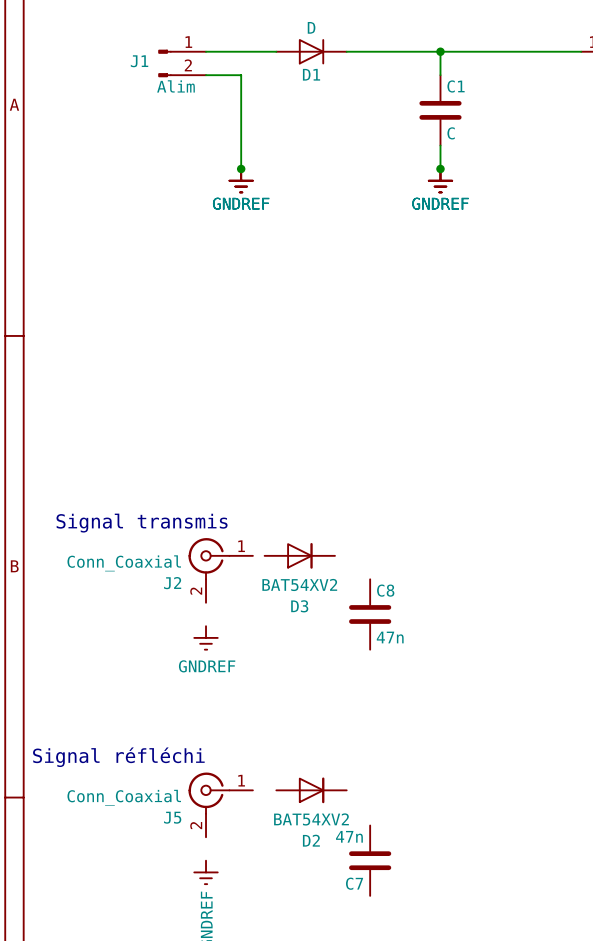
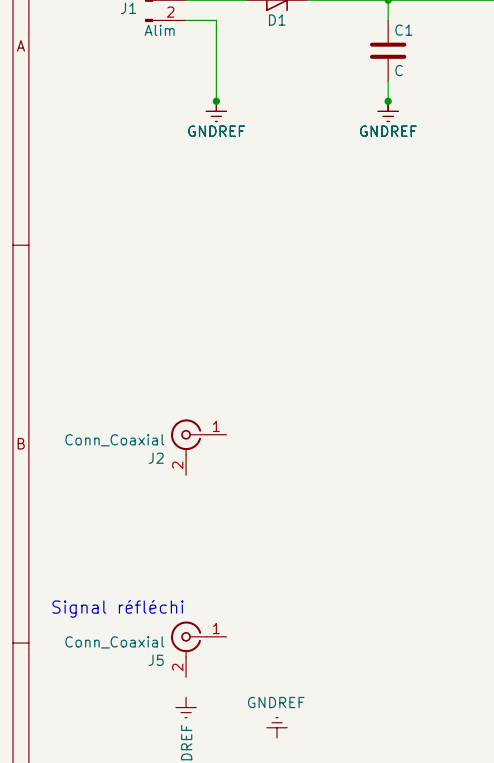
text: Signal transmis (142, 523) -> none
D3: BAT54XV2 (299, 555) -> none
C8: 47n (370, 614) -> none
power symbol: GNDREF (206, 637) -> none
D2: BAT54XV2 (311, 790) -> none
C7: 47n (370, 860) -> none
power symbol: none -> GNDREF (276, 727)

